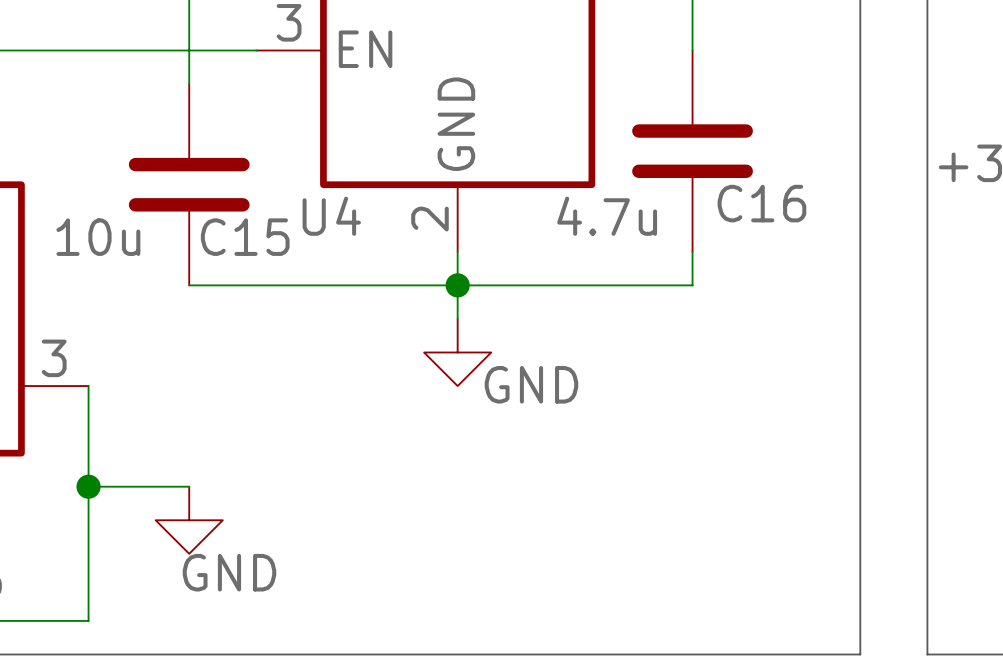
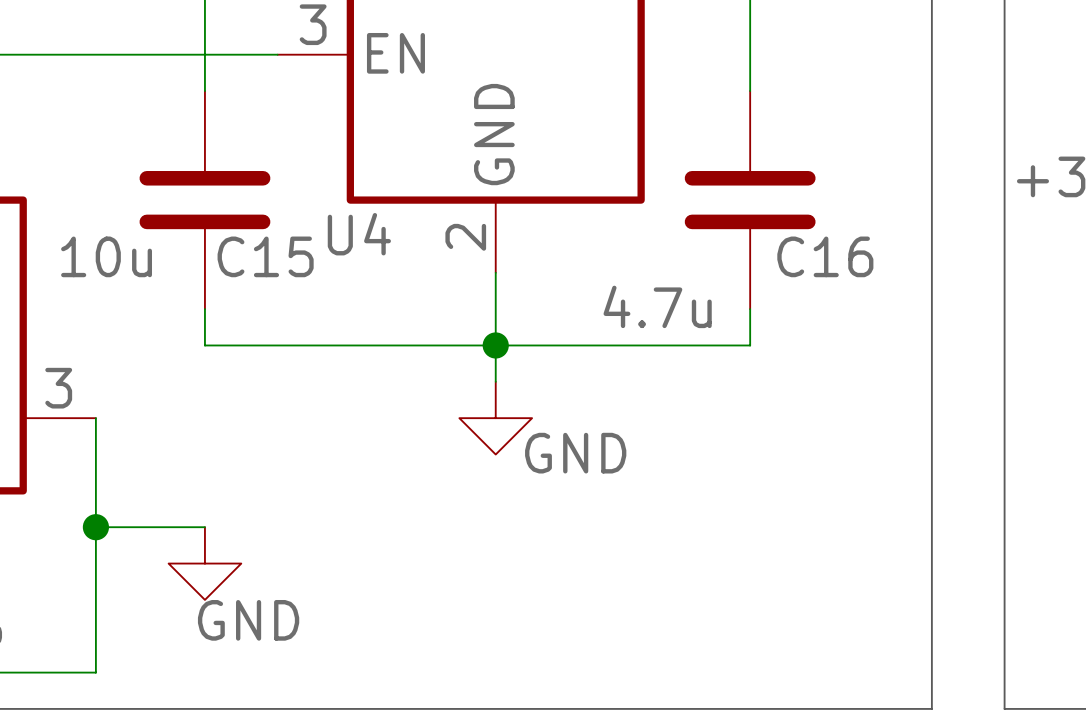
C16 position: (692, 151) -> (750, 200)
C16 value position: 4.7u (607, 216) -> 4.7u (657, 306)
wire: (692, 251) (692, 285) (189, 285) -> (750, 309) (750, 345) (204, 345) (204, 309)
junction position: (457, 285) -> (495, 345)
power symbol position: GND (457, 352) -> GND (495, 418)

